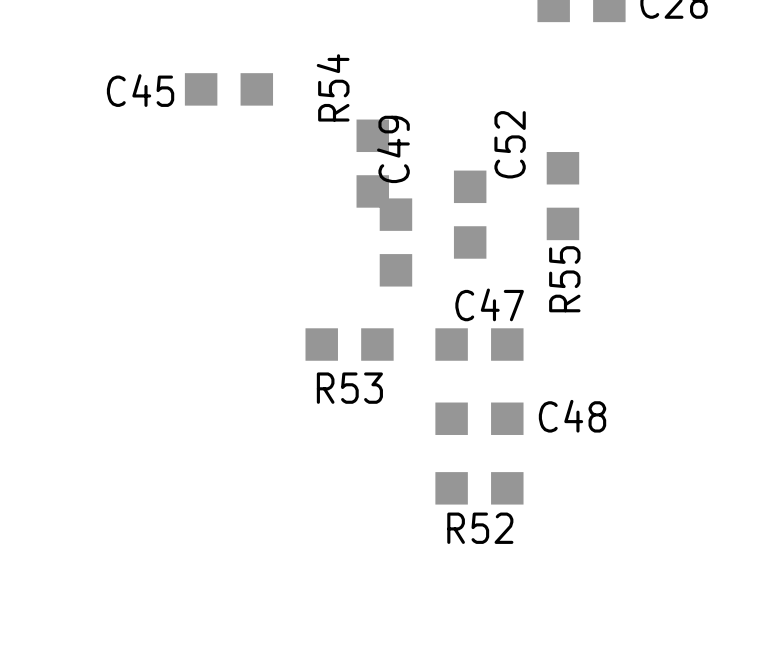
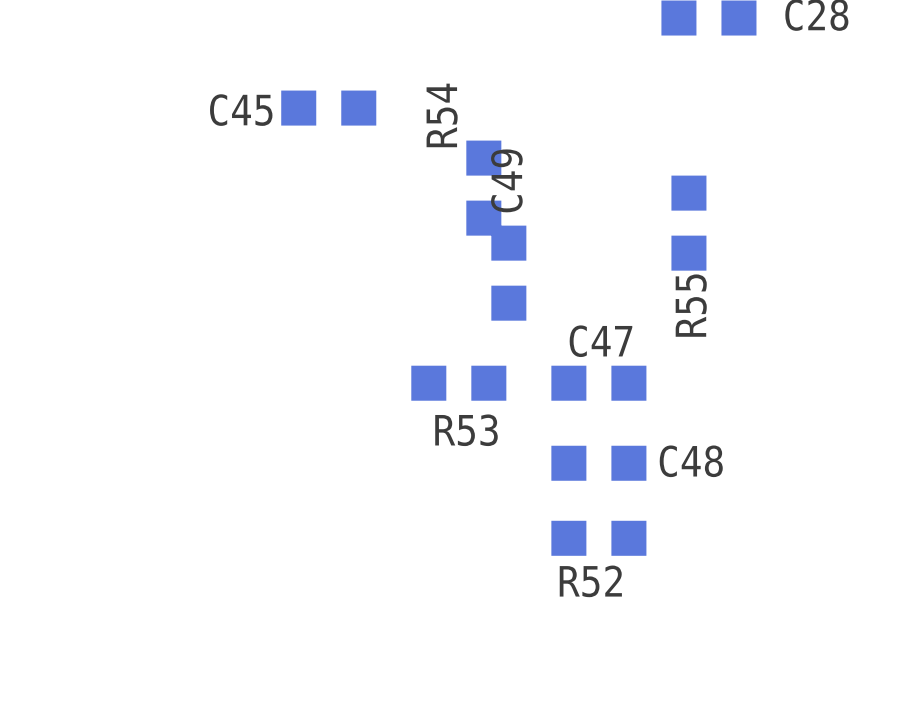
C52: (470, 214) -> none

